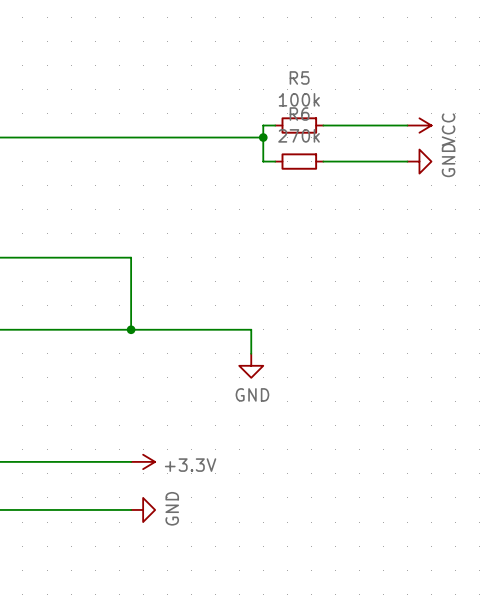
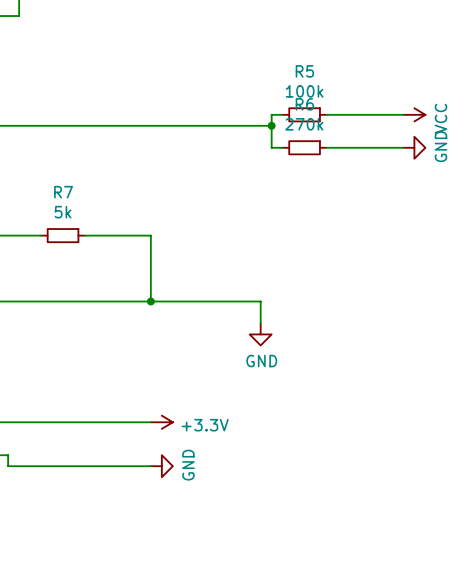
wire: (10, 257) (59, 257) -> none
R7: none -> 5k (63, 235)

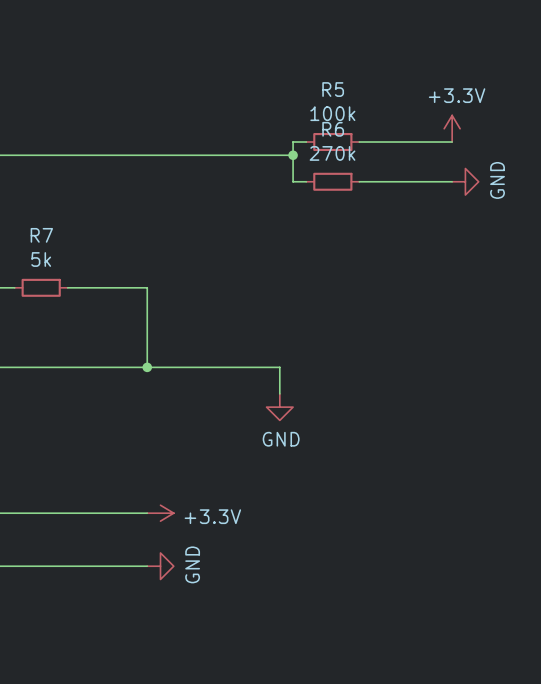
power symbol: none -> +3.3V (452, 128)
power symbol: VCC (414, 114) -> none

